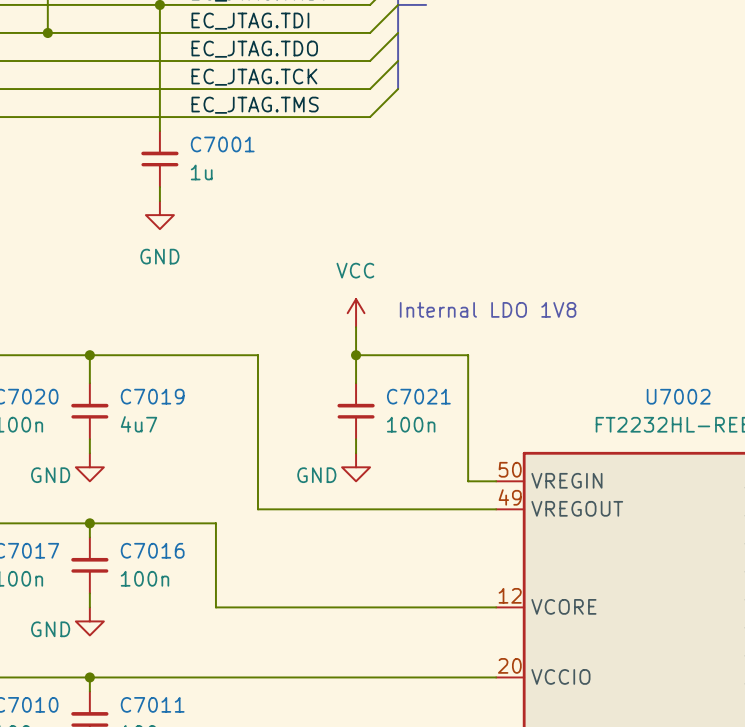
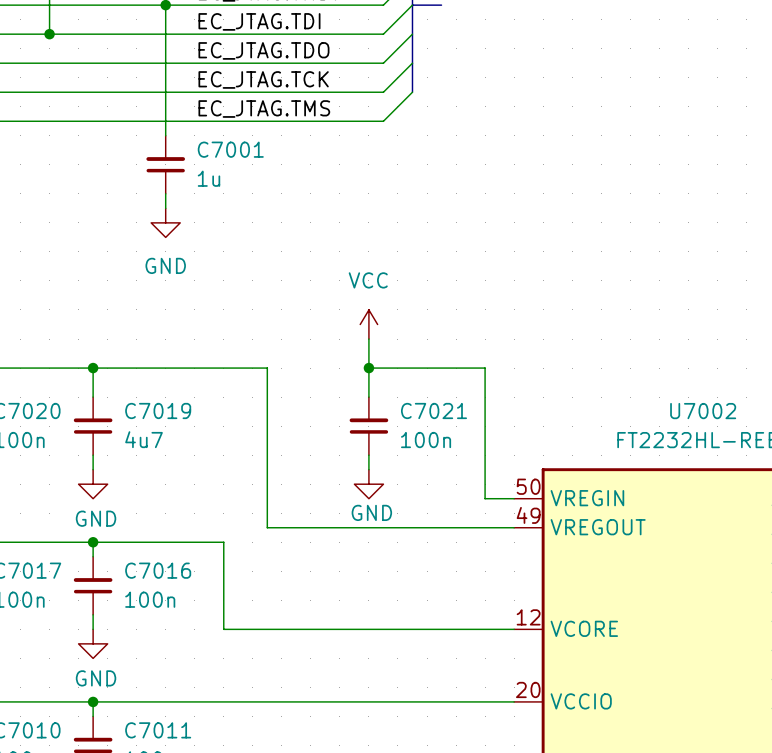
text: Internal LDO 1V8 (488, 309) -> none
power symbol text position: GND (50, 475) -> GND (96, 518)
power symbol text position: GND (316, 475) -> GND (371, 512)
power symbol text position: GND (50, 629) -> GND (96, 678)

